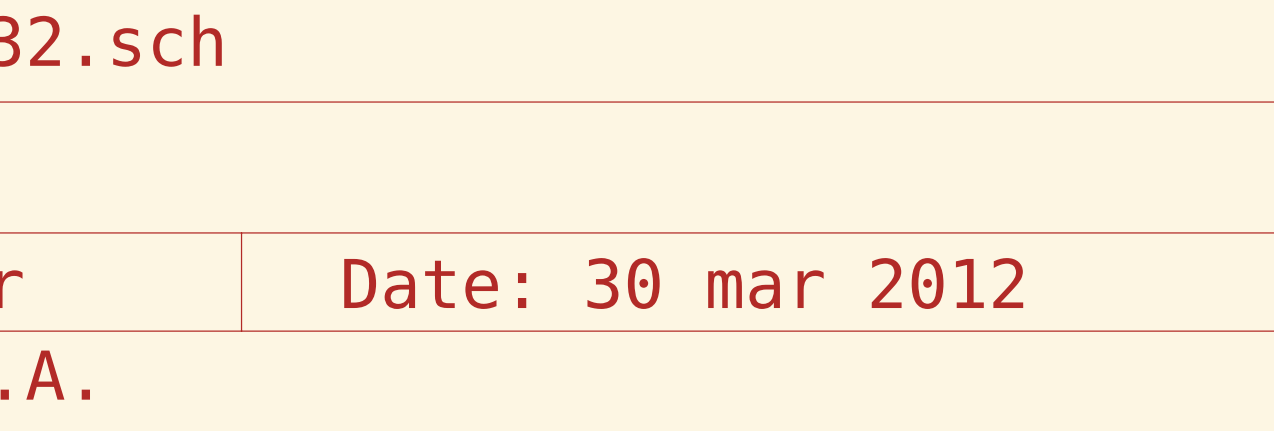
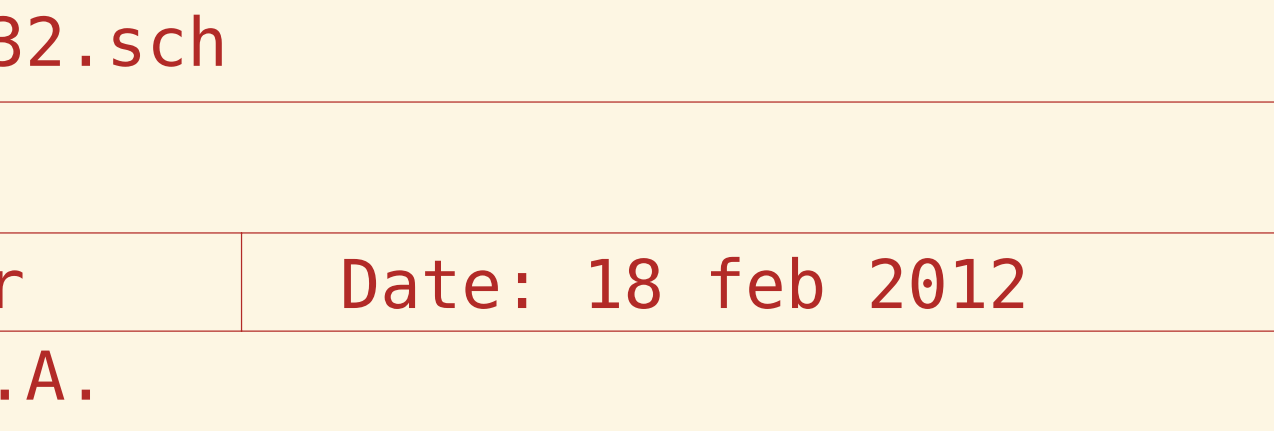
title block: Date: 30 mar 2012 (683, 283) -> Date: 18 feb 2012 (683, 282)

